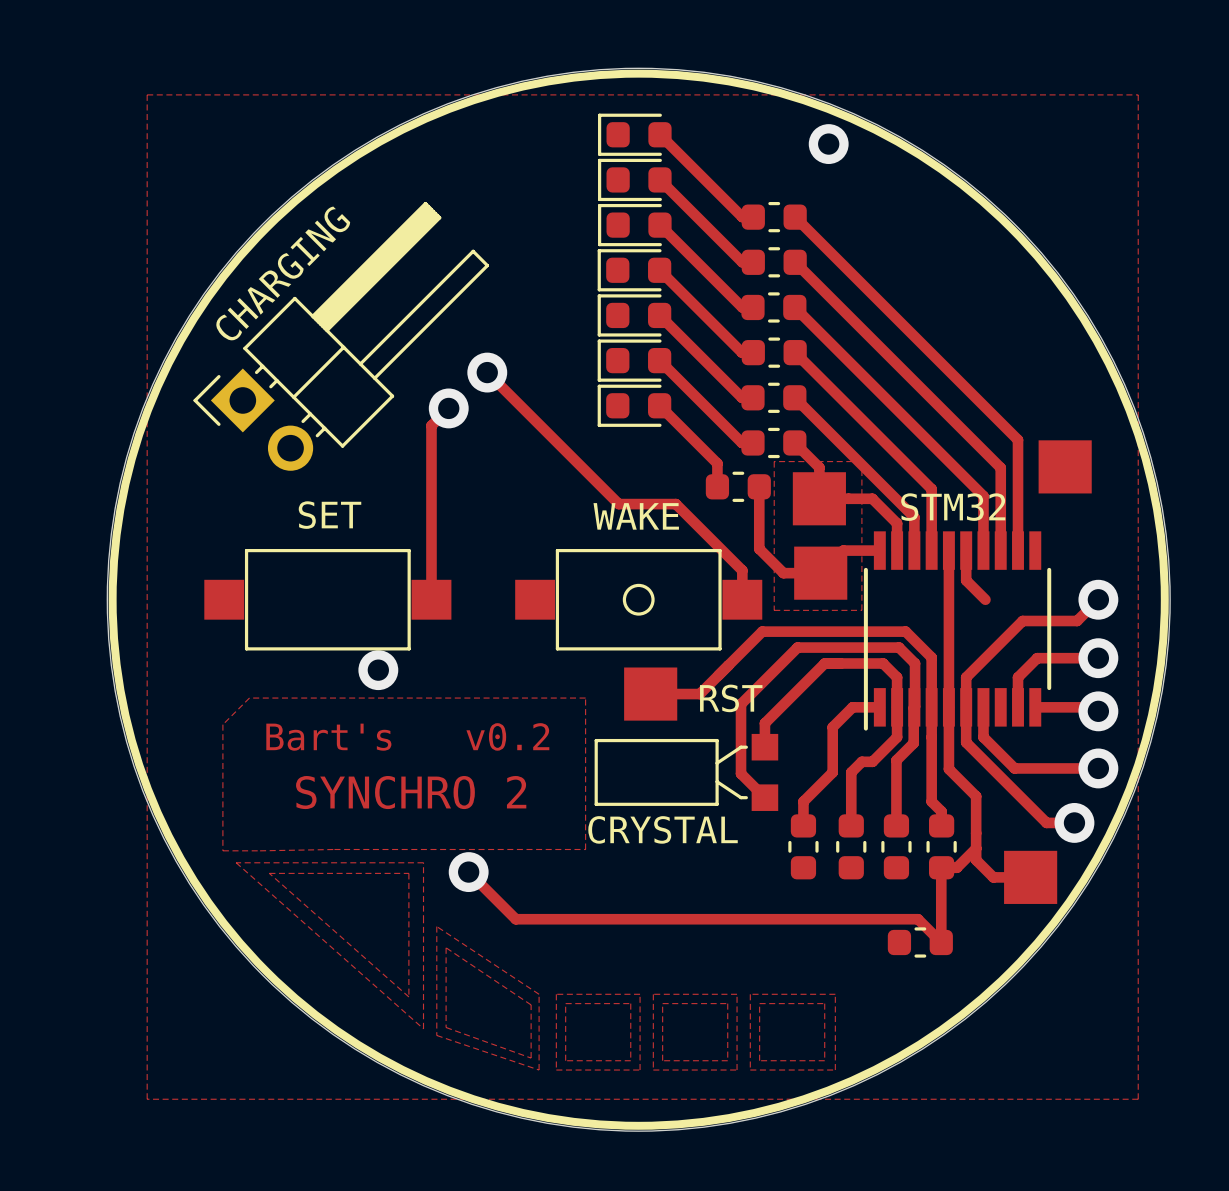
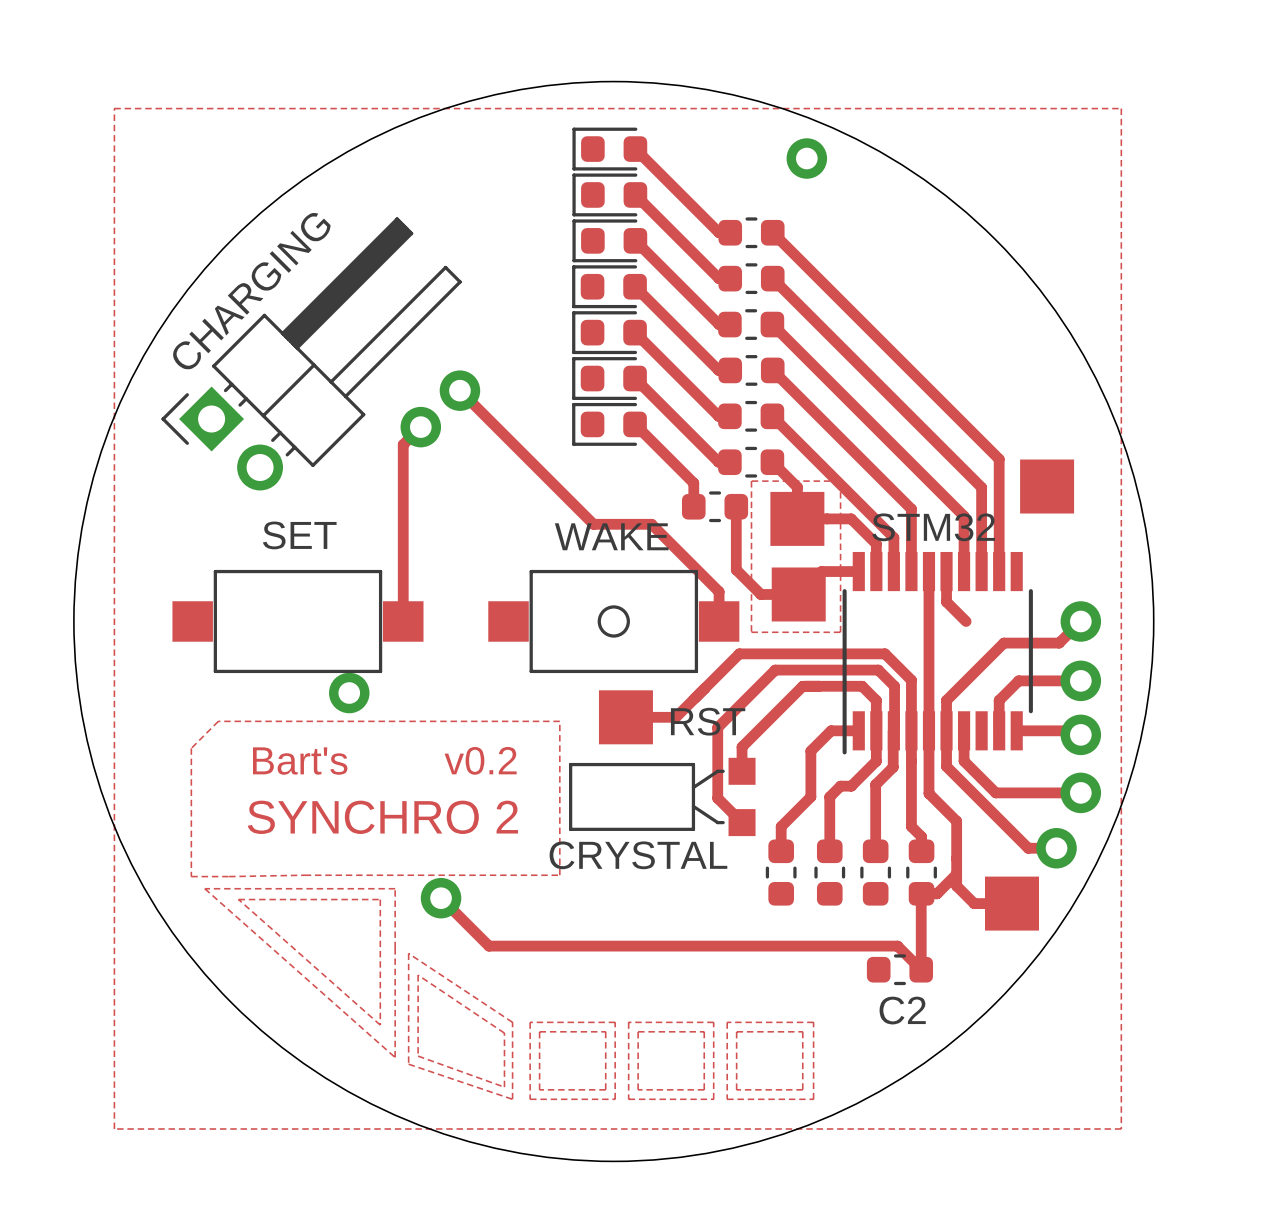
drawing: [108, 69, 1169, 1130] -> none
C2 name: none -> C2 (902, 1010)

